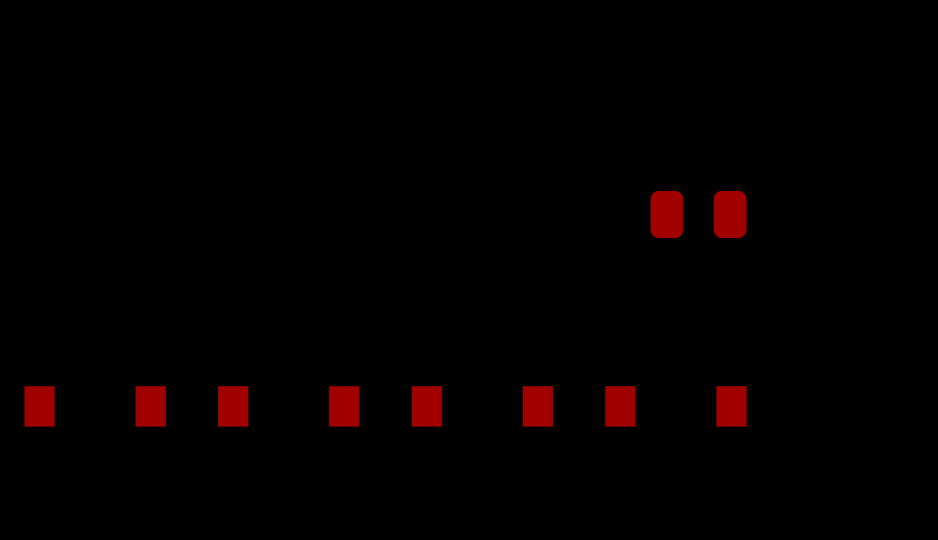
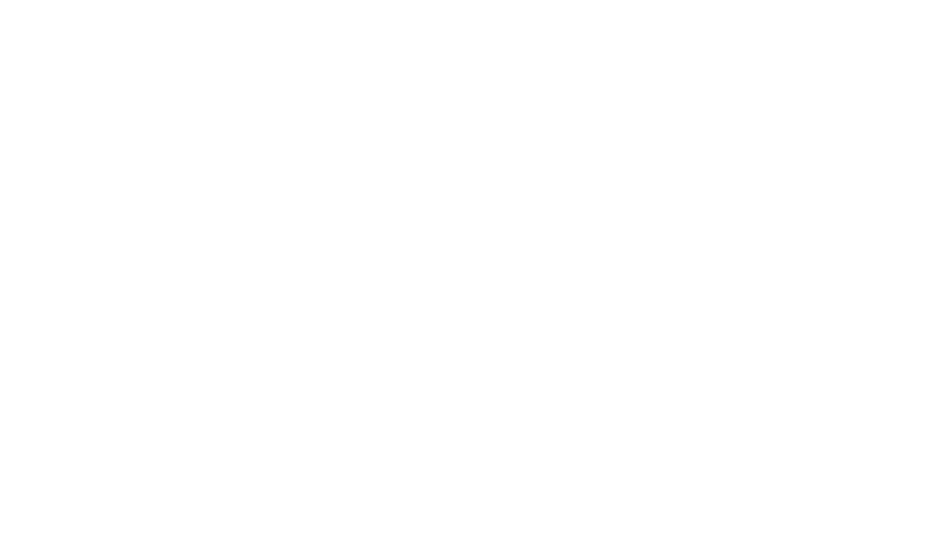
part: (698, 214) -> none
part: (95, 406) -> none
part: (288, 406) -> none
part: (482, 406) -> none
part: (675, 406) -> none

